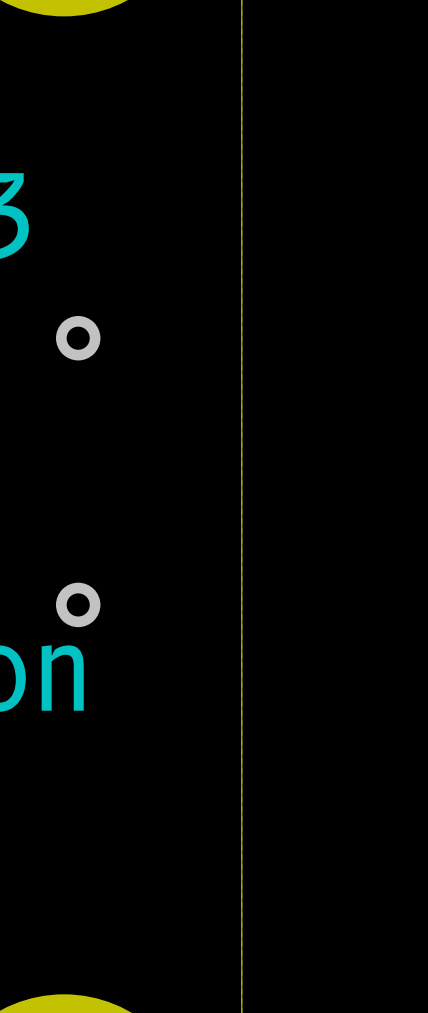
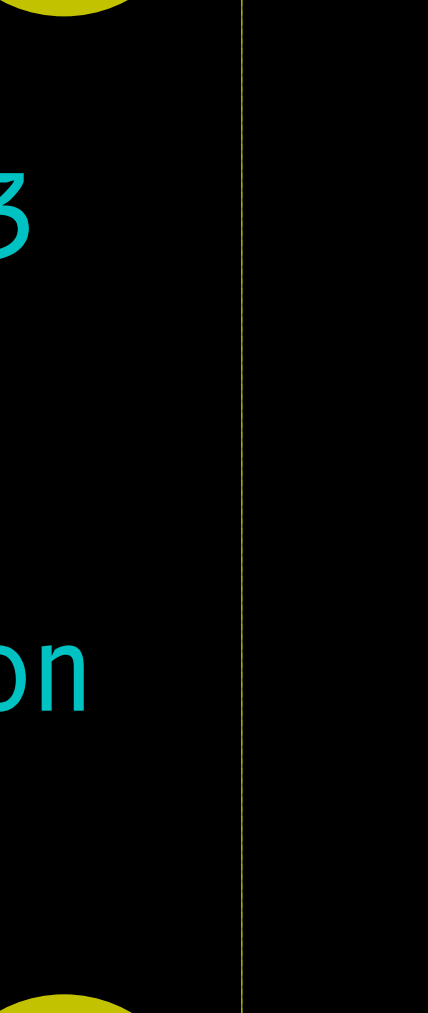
via: (78, 338) -> none
via: (78, 604) -> none

